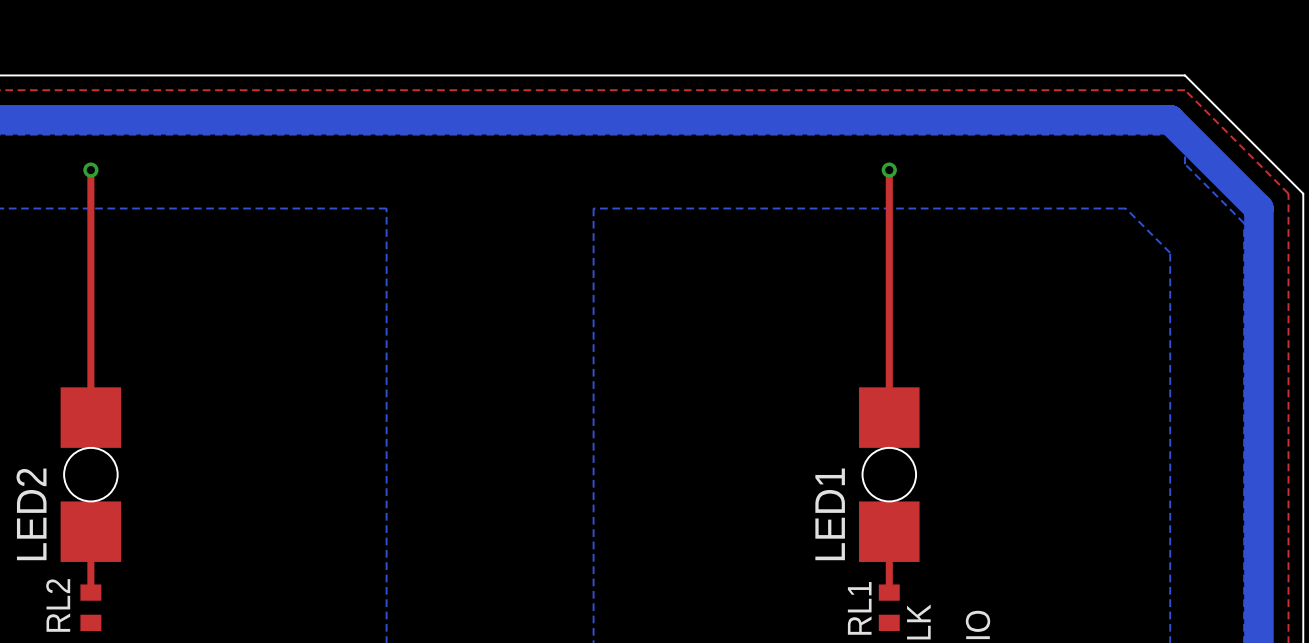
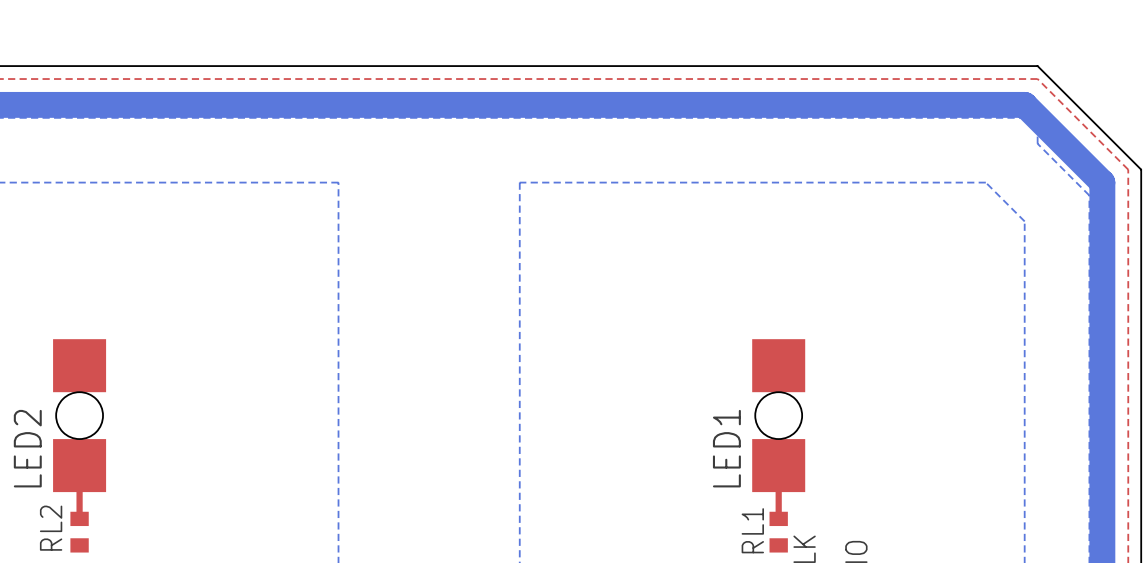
top track: (90, 170) (90, 417) -> none
via: (90, 170) -> none
top track: (889, 170) (889, 417) -> none
via: (889, 170) -> none

